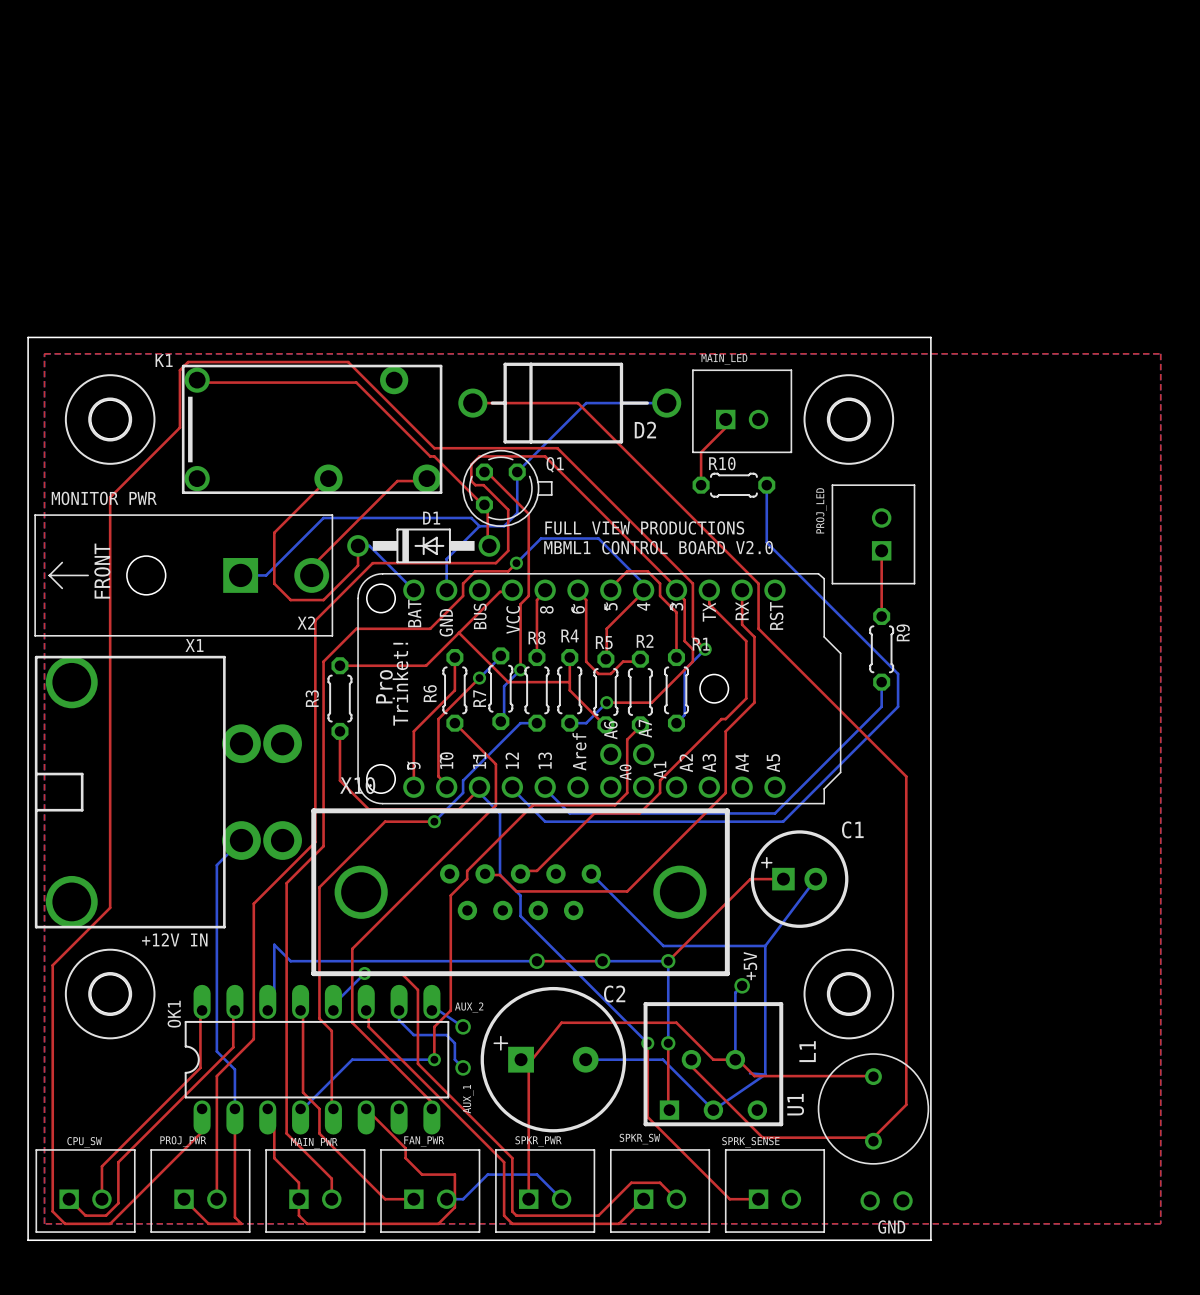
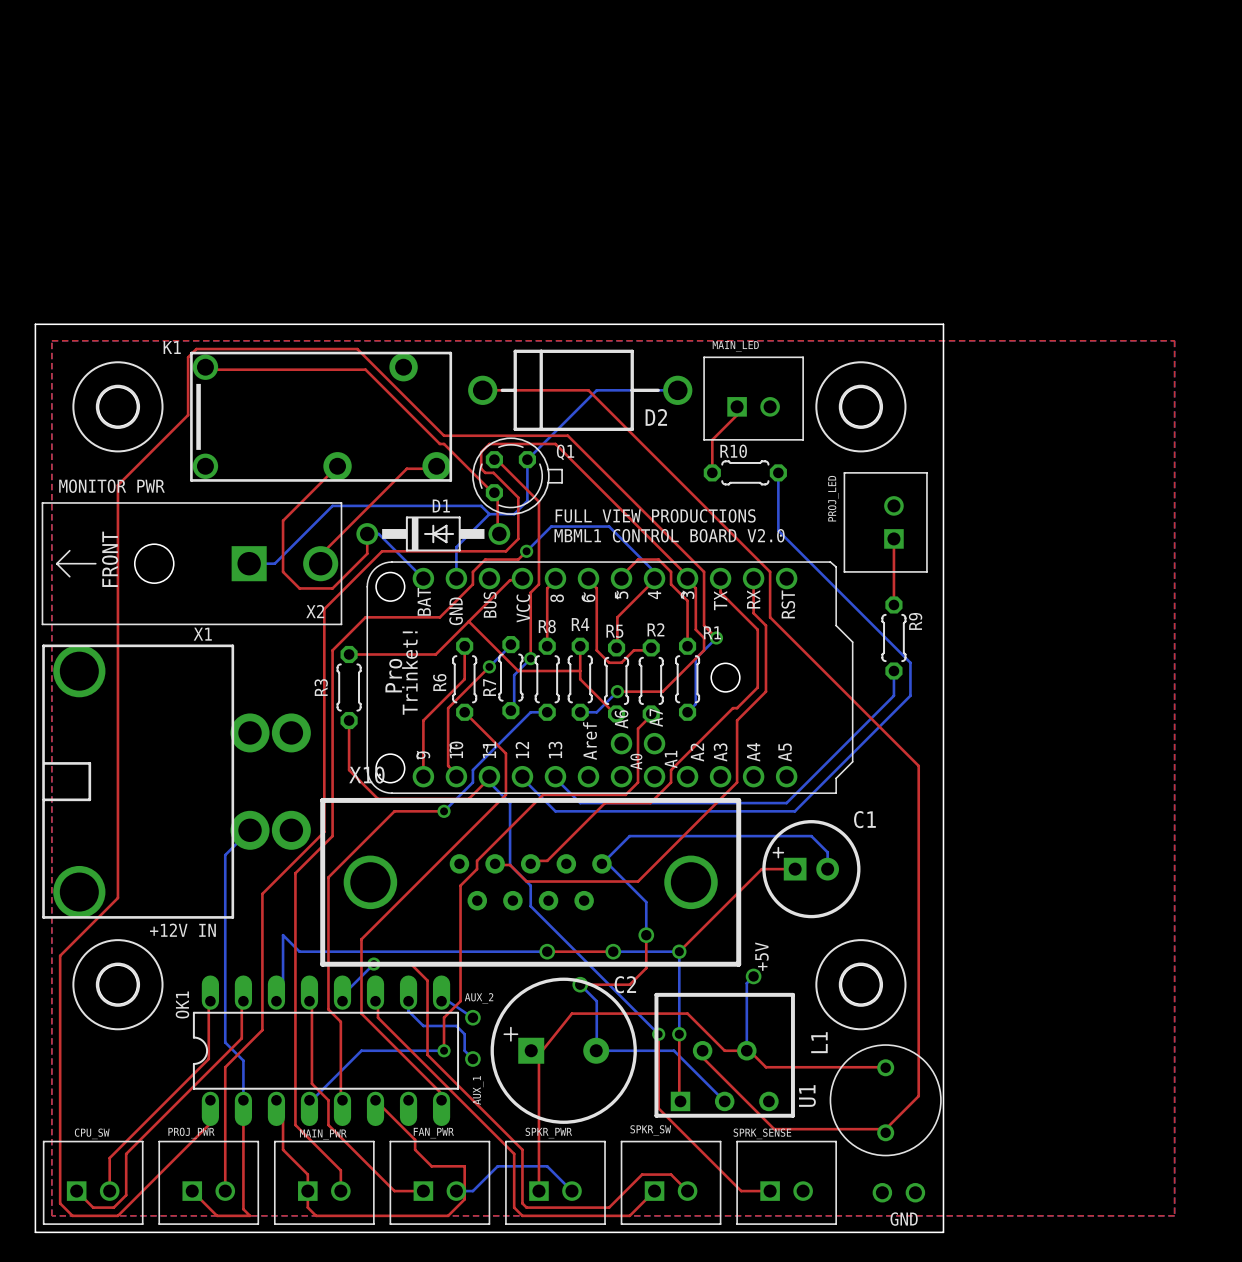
bottom track: (591, 873) (663, 945) (765, 945) -> none
bottom track: (815, 879) (765, 945) -> (827, 869) (827, 852) (811, 836) (629, 836) (601, 863) (608, 863) (646, 902) (646, 935)
top track: none -> (646, 935) (646, 968) (629, 984) (580, 984)
via: none -> (646, 935)
bottom track: (765, 945) (765, 1074) -> none
bottom track: none -> (580, 984) (596, 1001) (596, 1050)
via: none -> (580, 984)
bottom track: (750, 1073) (765, 1074) -> none
bottom track: (765, 1074) (713, 1110) -> none

